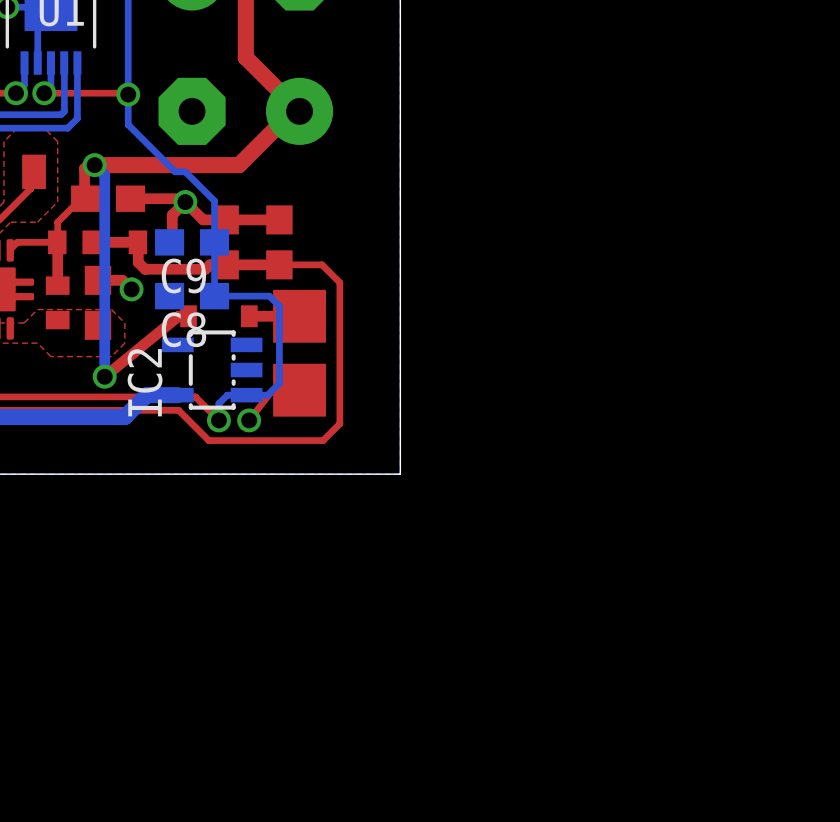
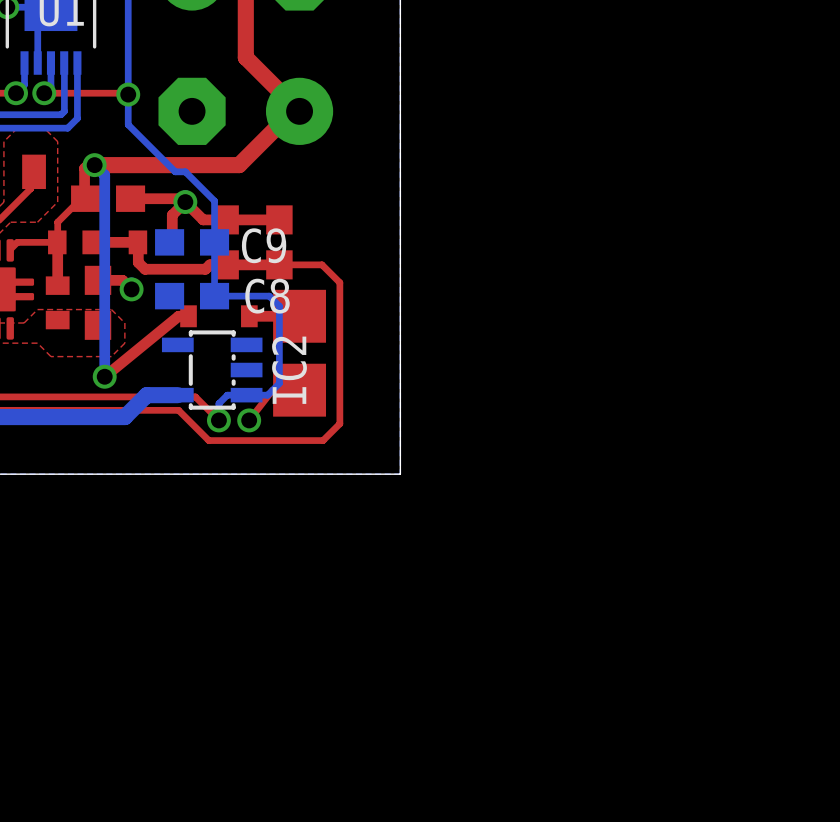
C9 name position: C9 (183, 275) -> C9 (264, 245)
C8 name position: C8 (183, 329) -> C8 (267, 296)
IC2 name position: IC2 (145, 382) -> IC2 (289, 370)

